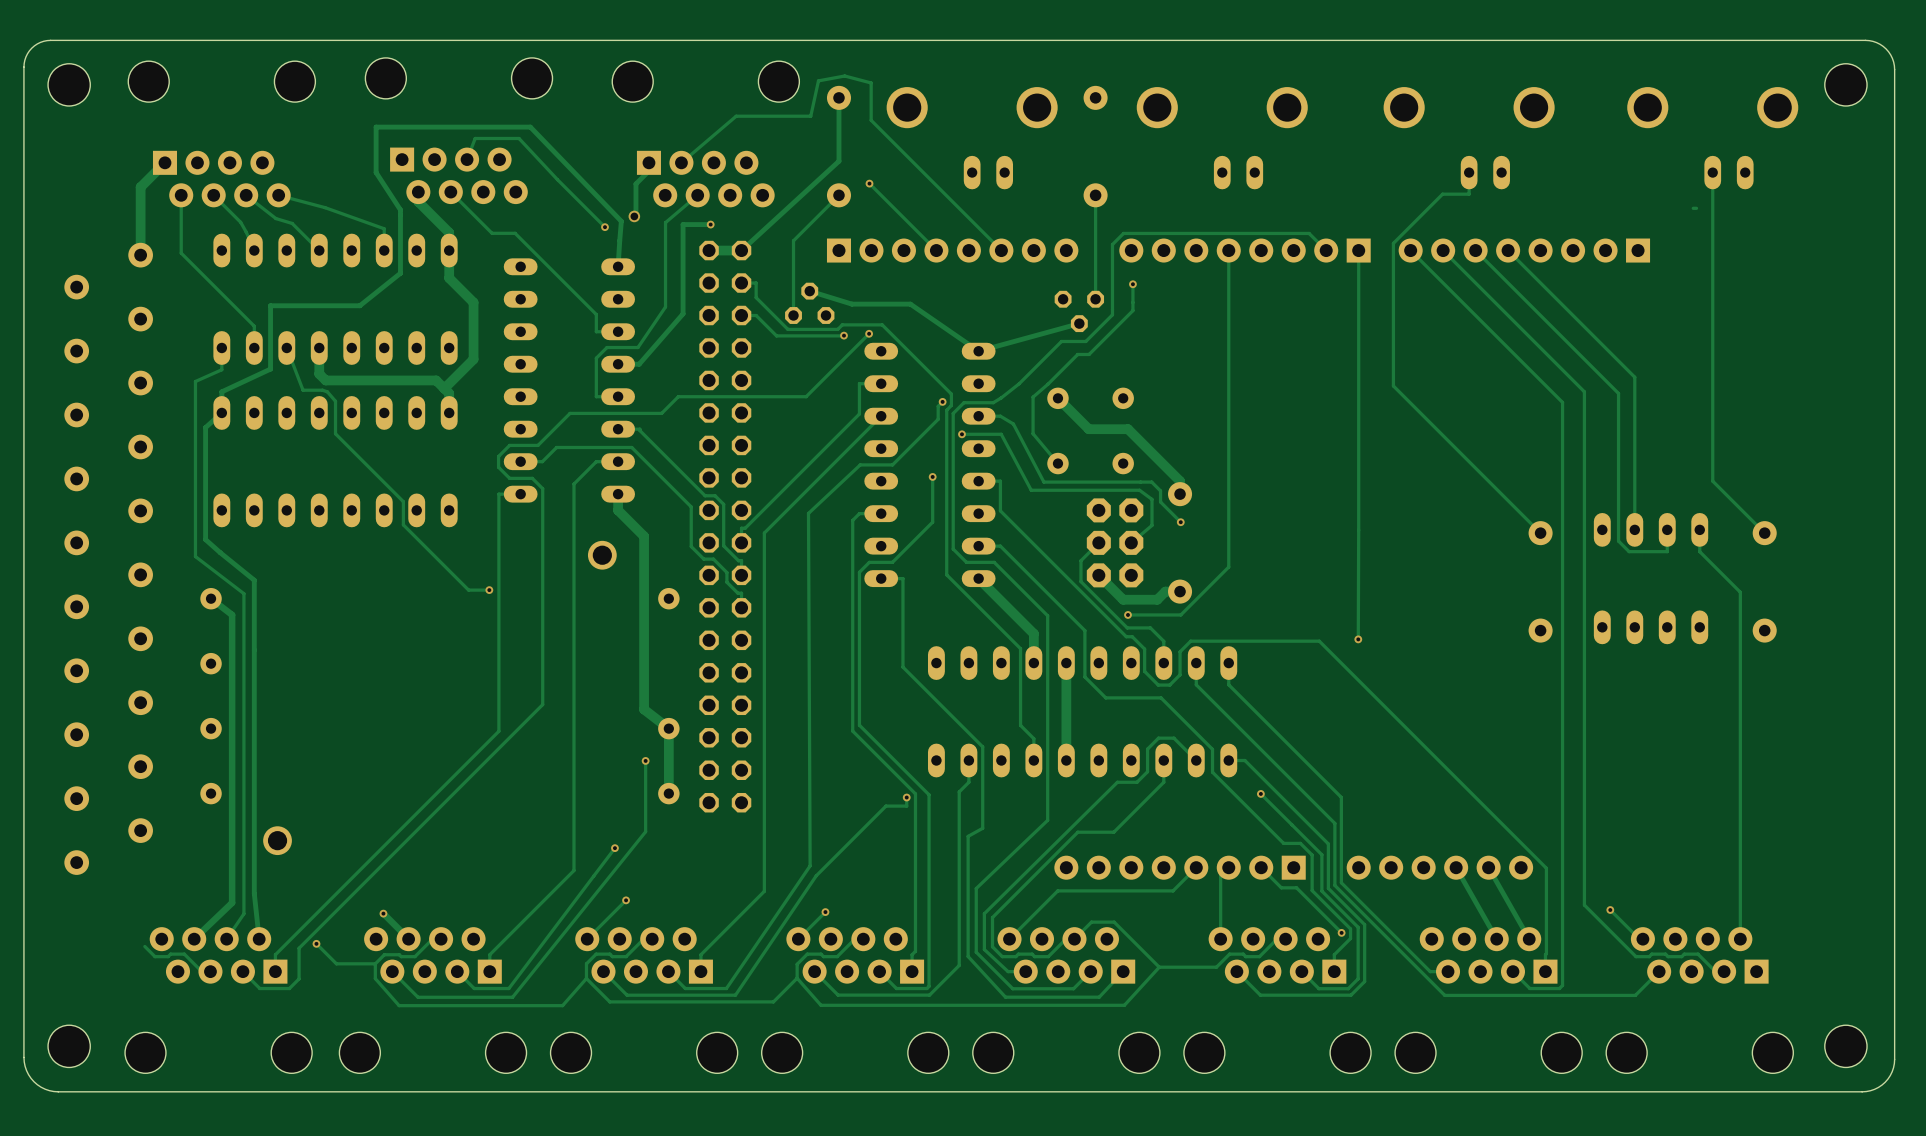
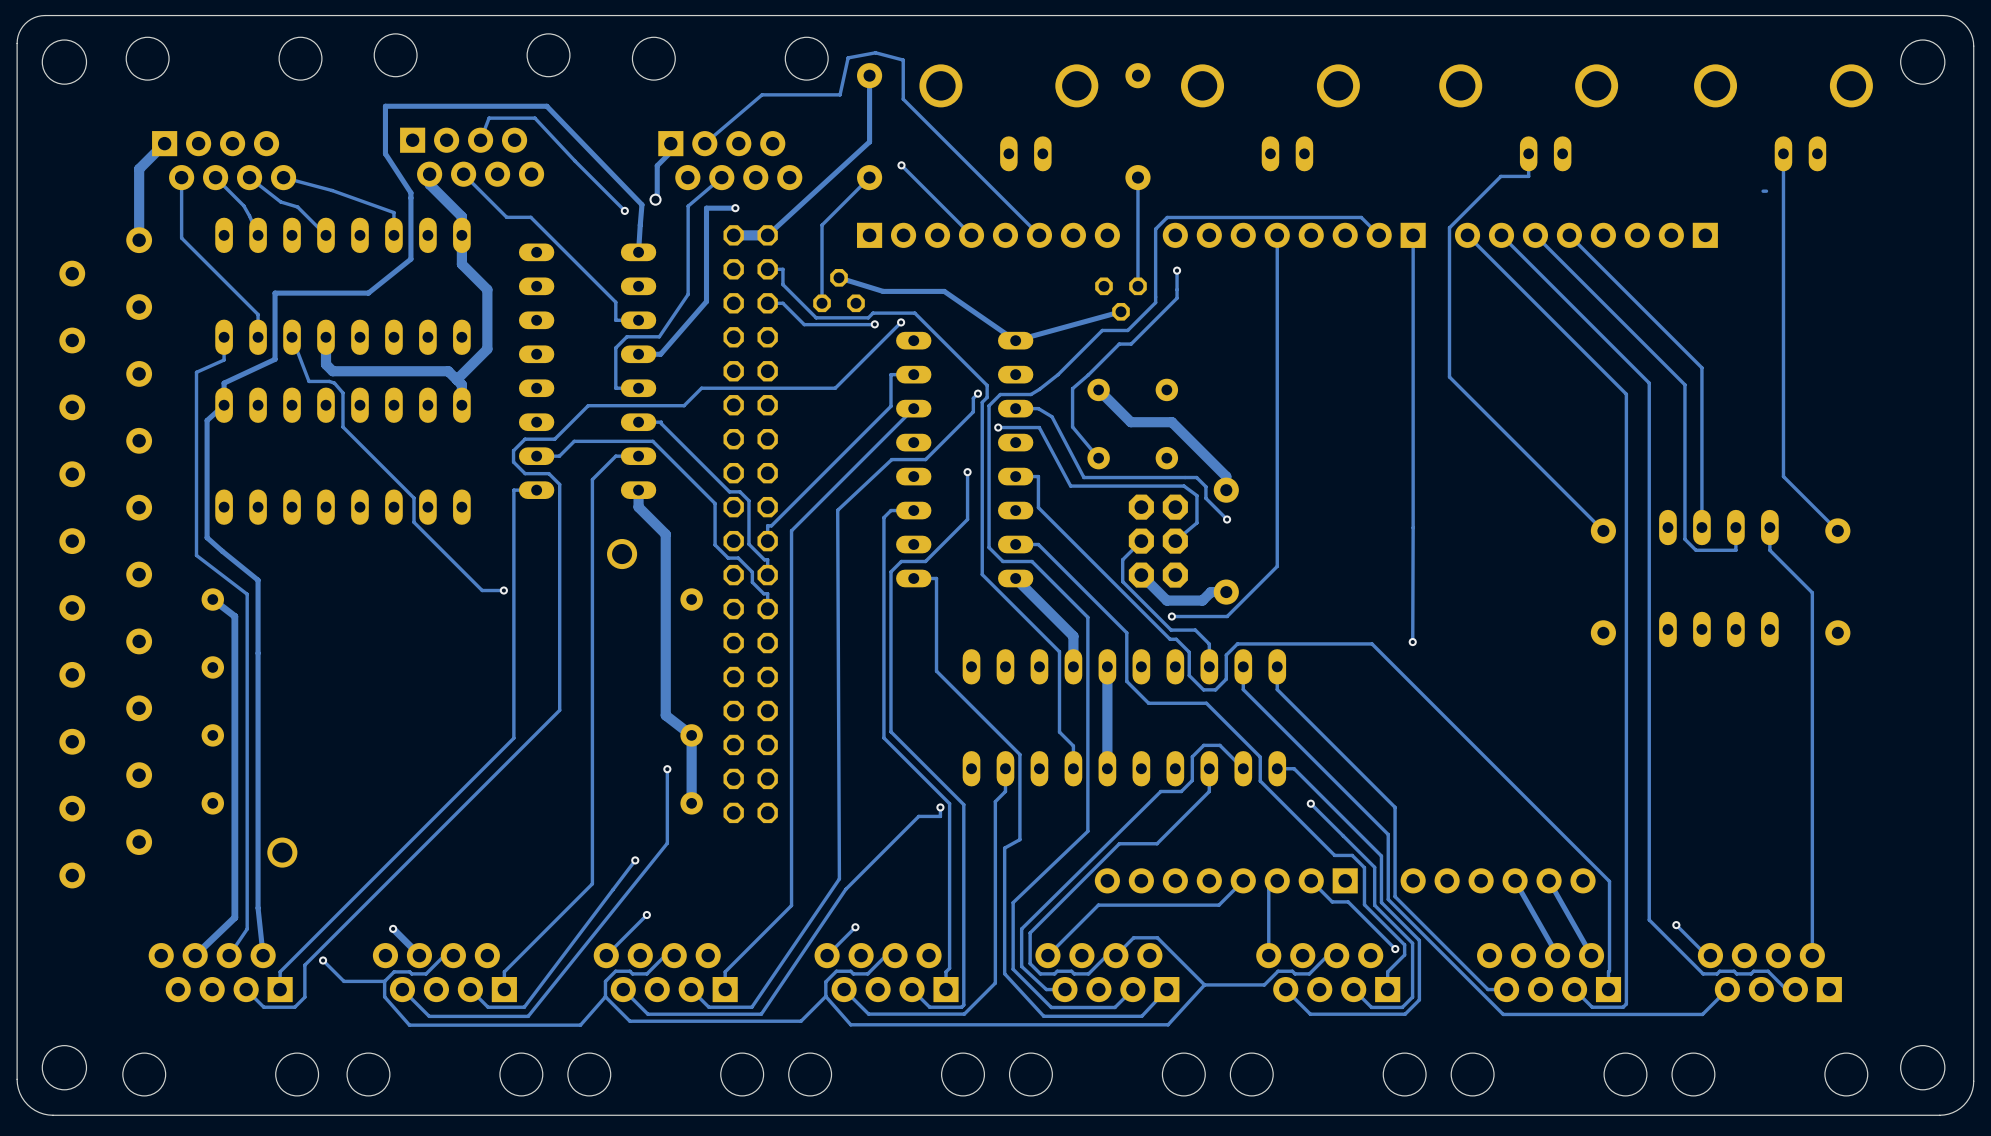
track: (144, 946) (155, 956) (184, 954) (201, 971) (210, 971) -> none

